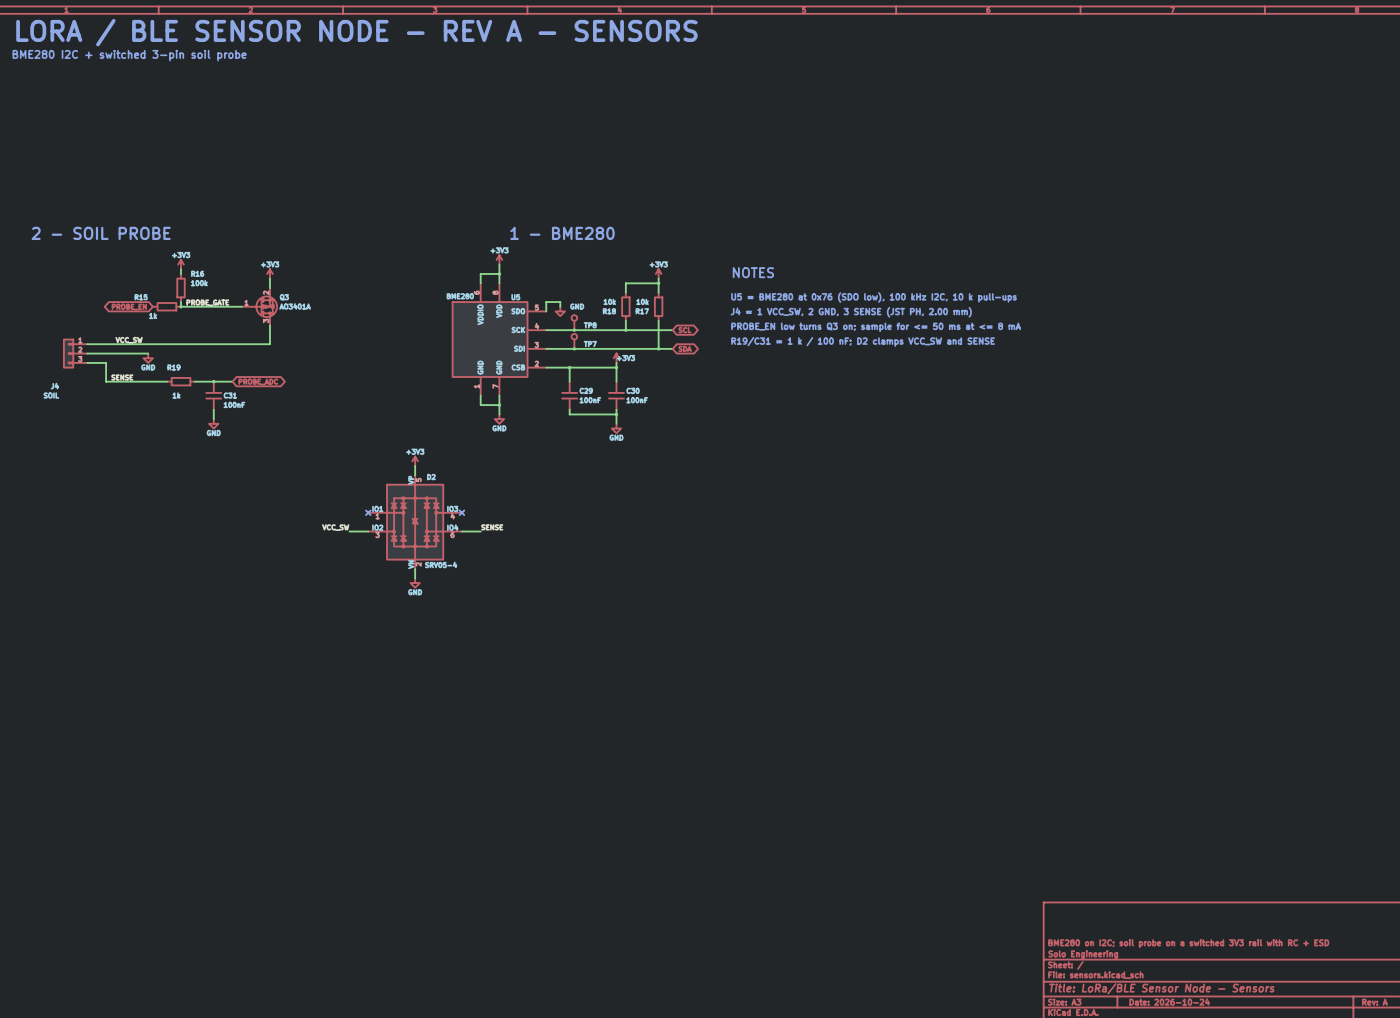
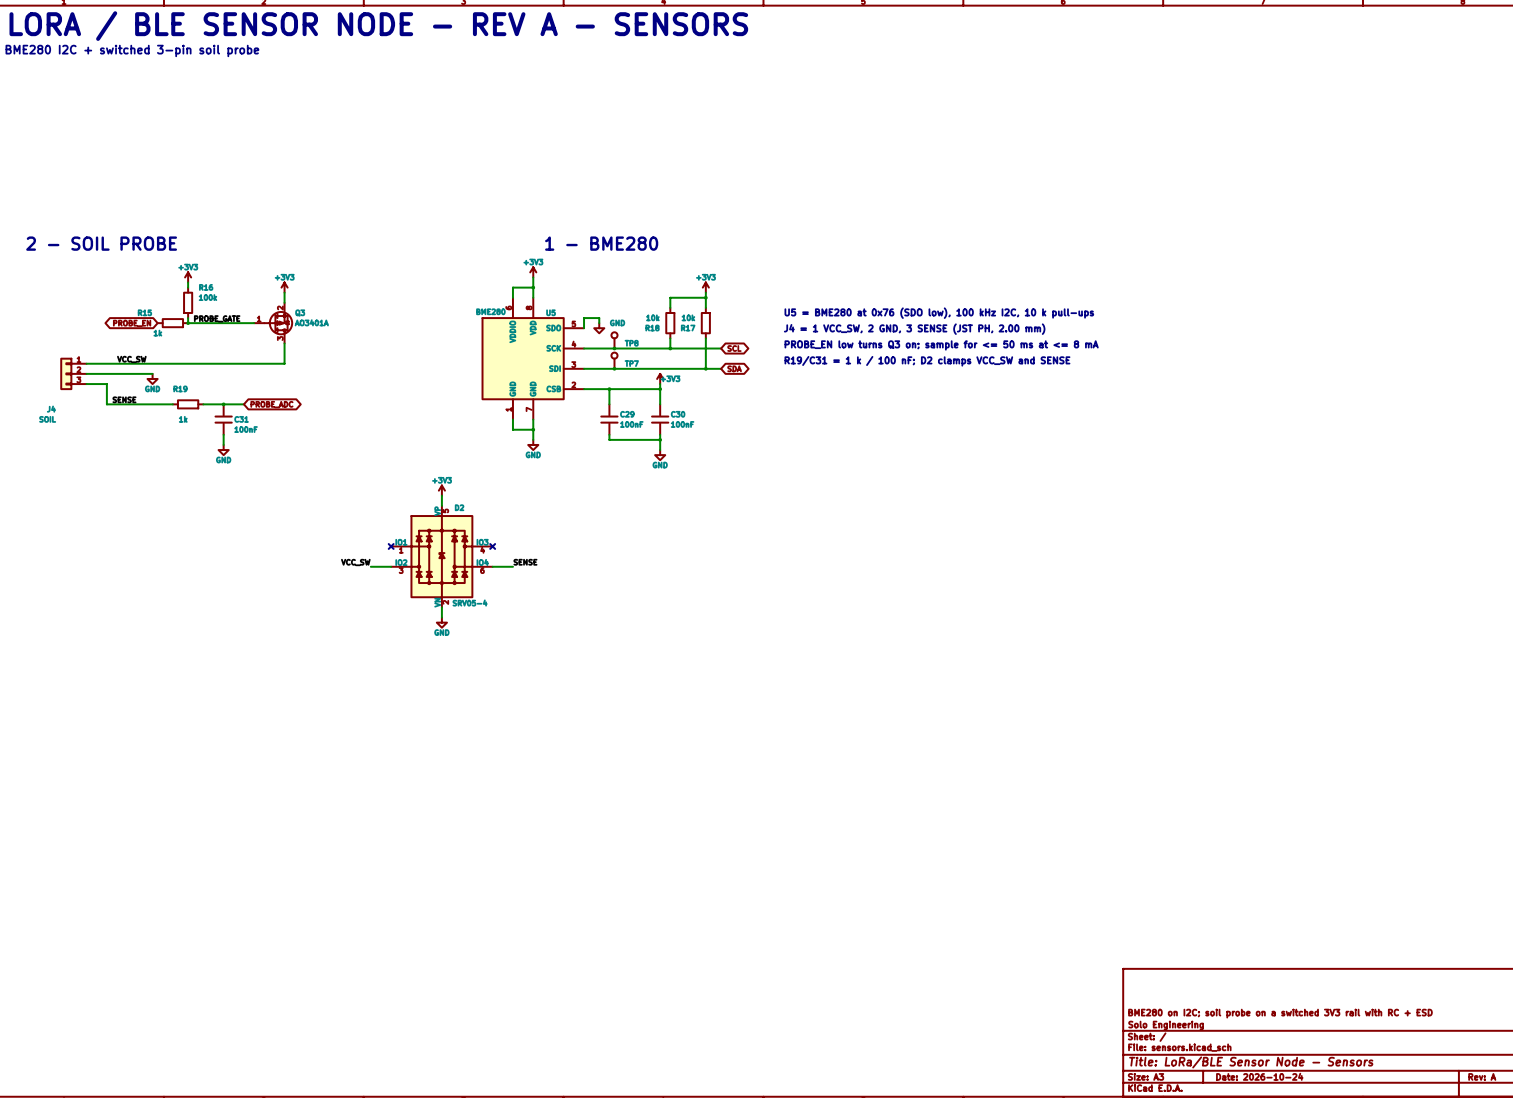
text: NOTES (753, 272) -> none

